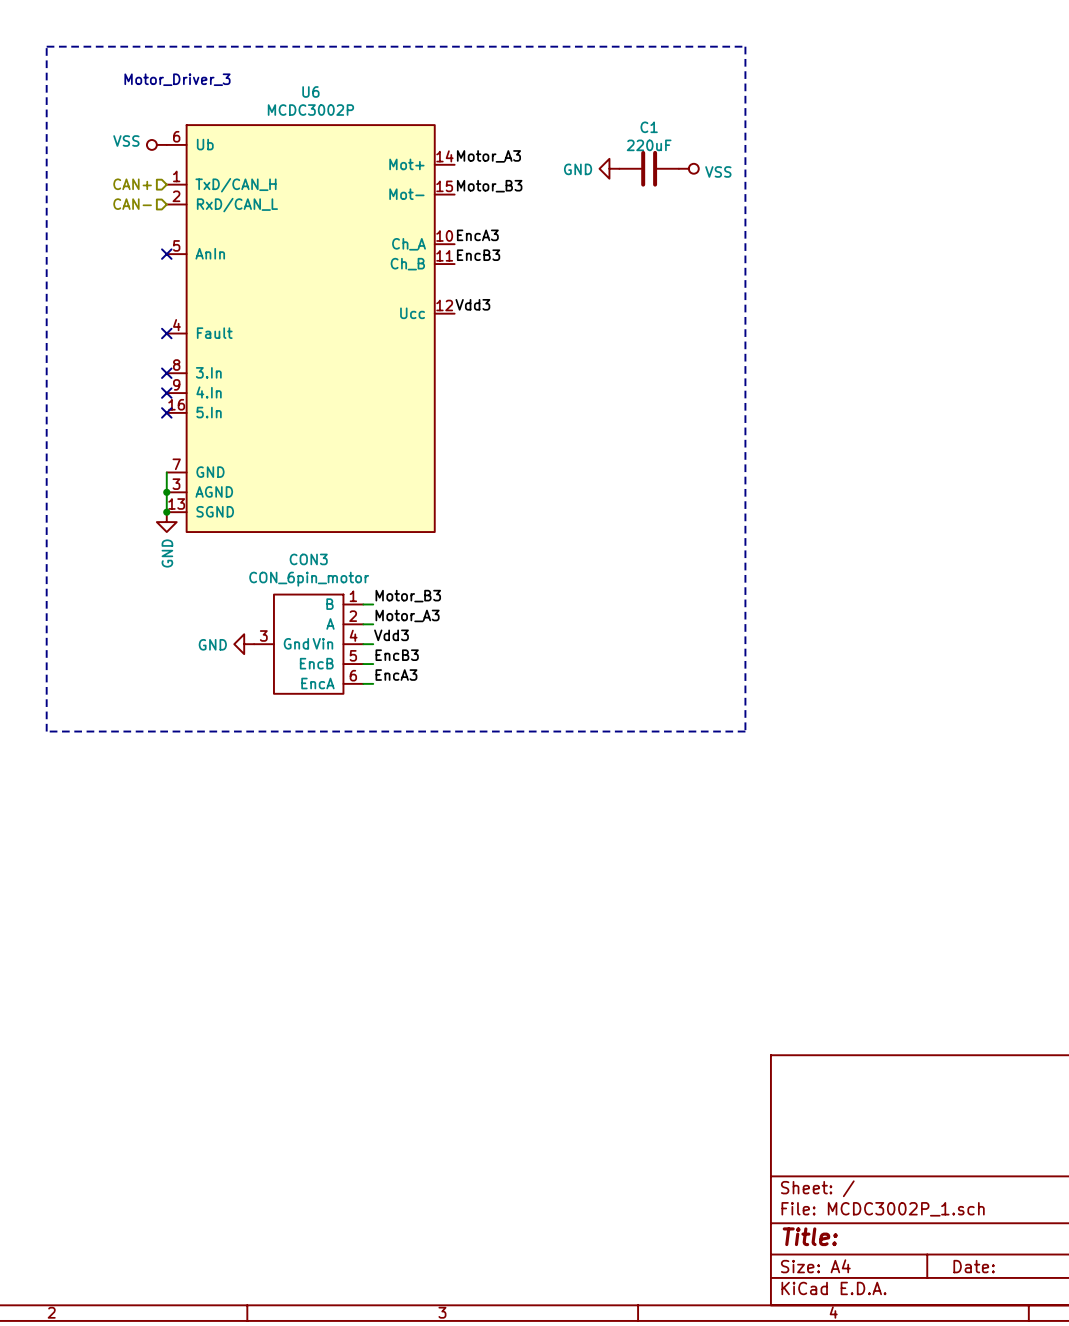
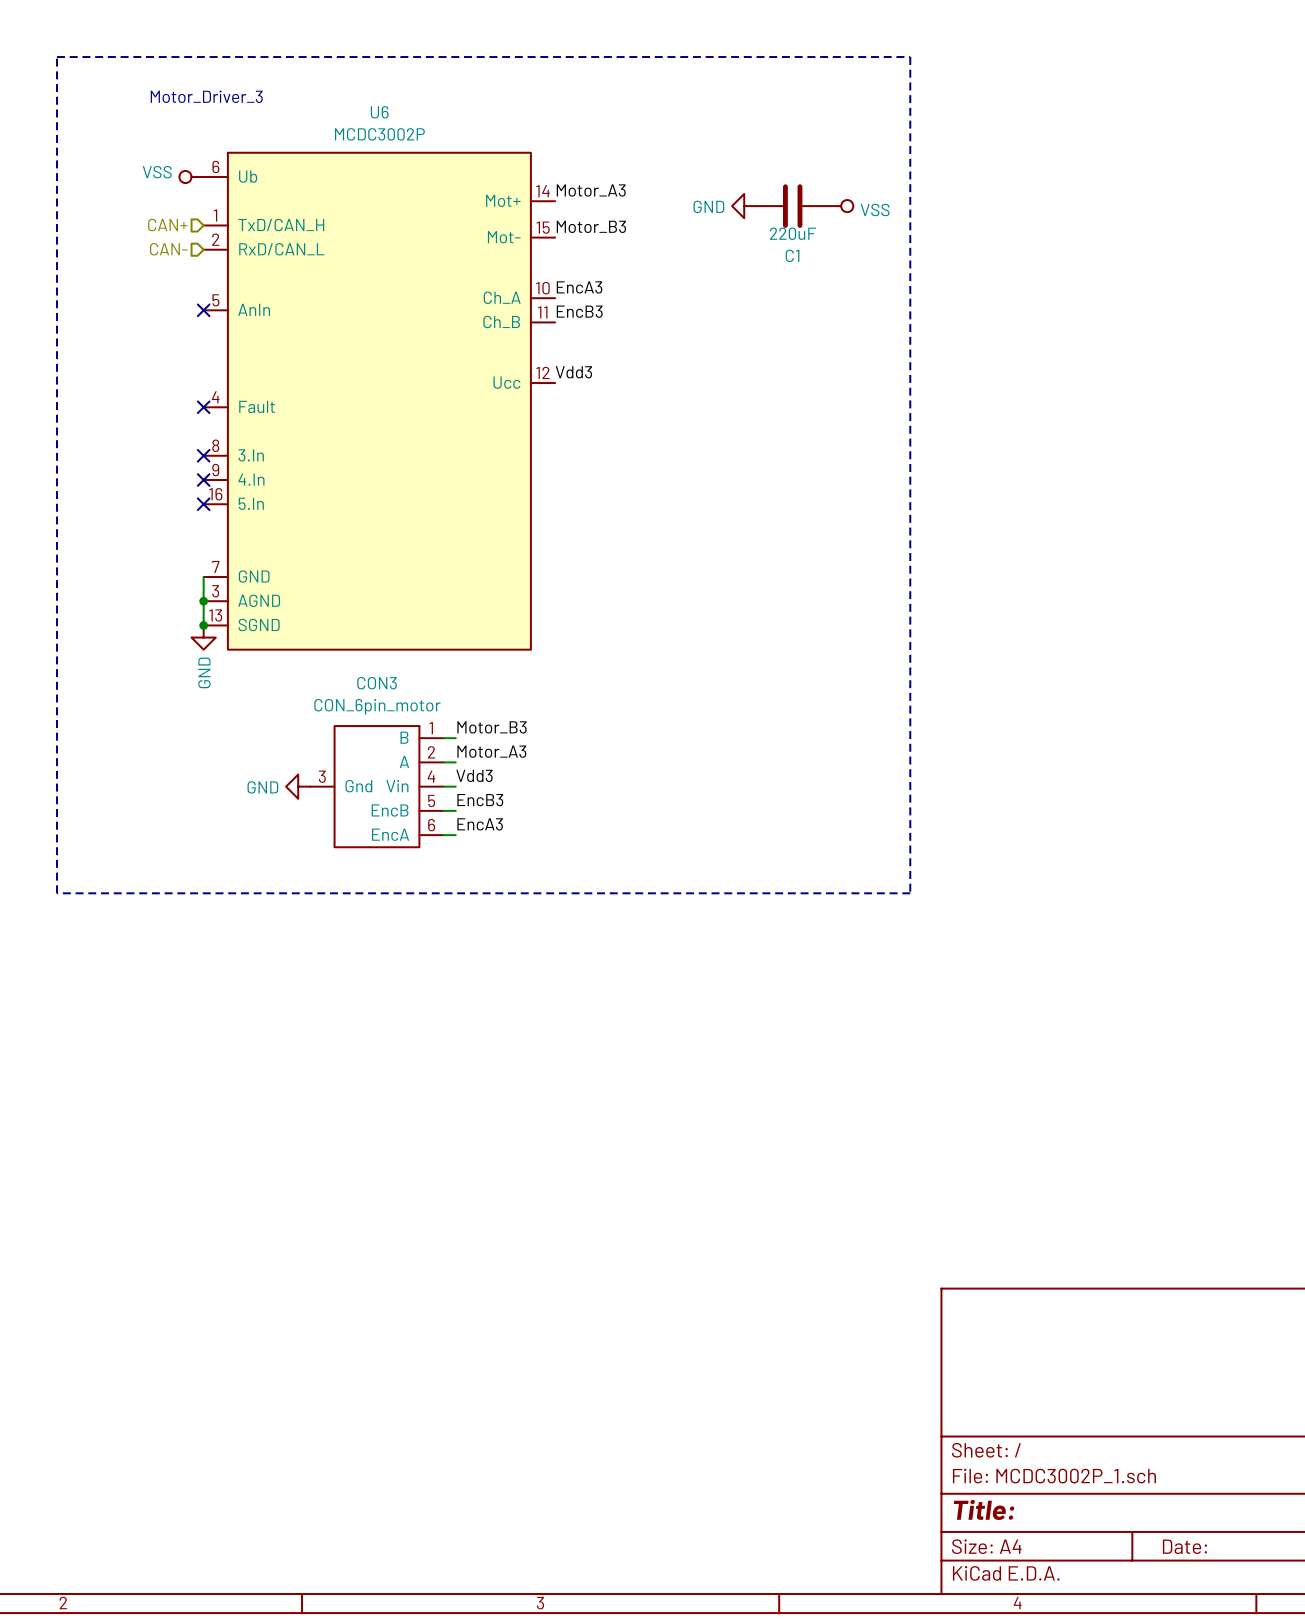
C1 name position: C1 (649, 127) -> C1 (792, 255)
C1 value position: 220uF (649, 145) -> 220uF (793, 233)

